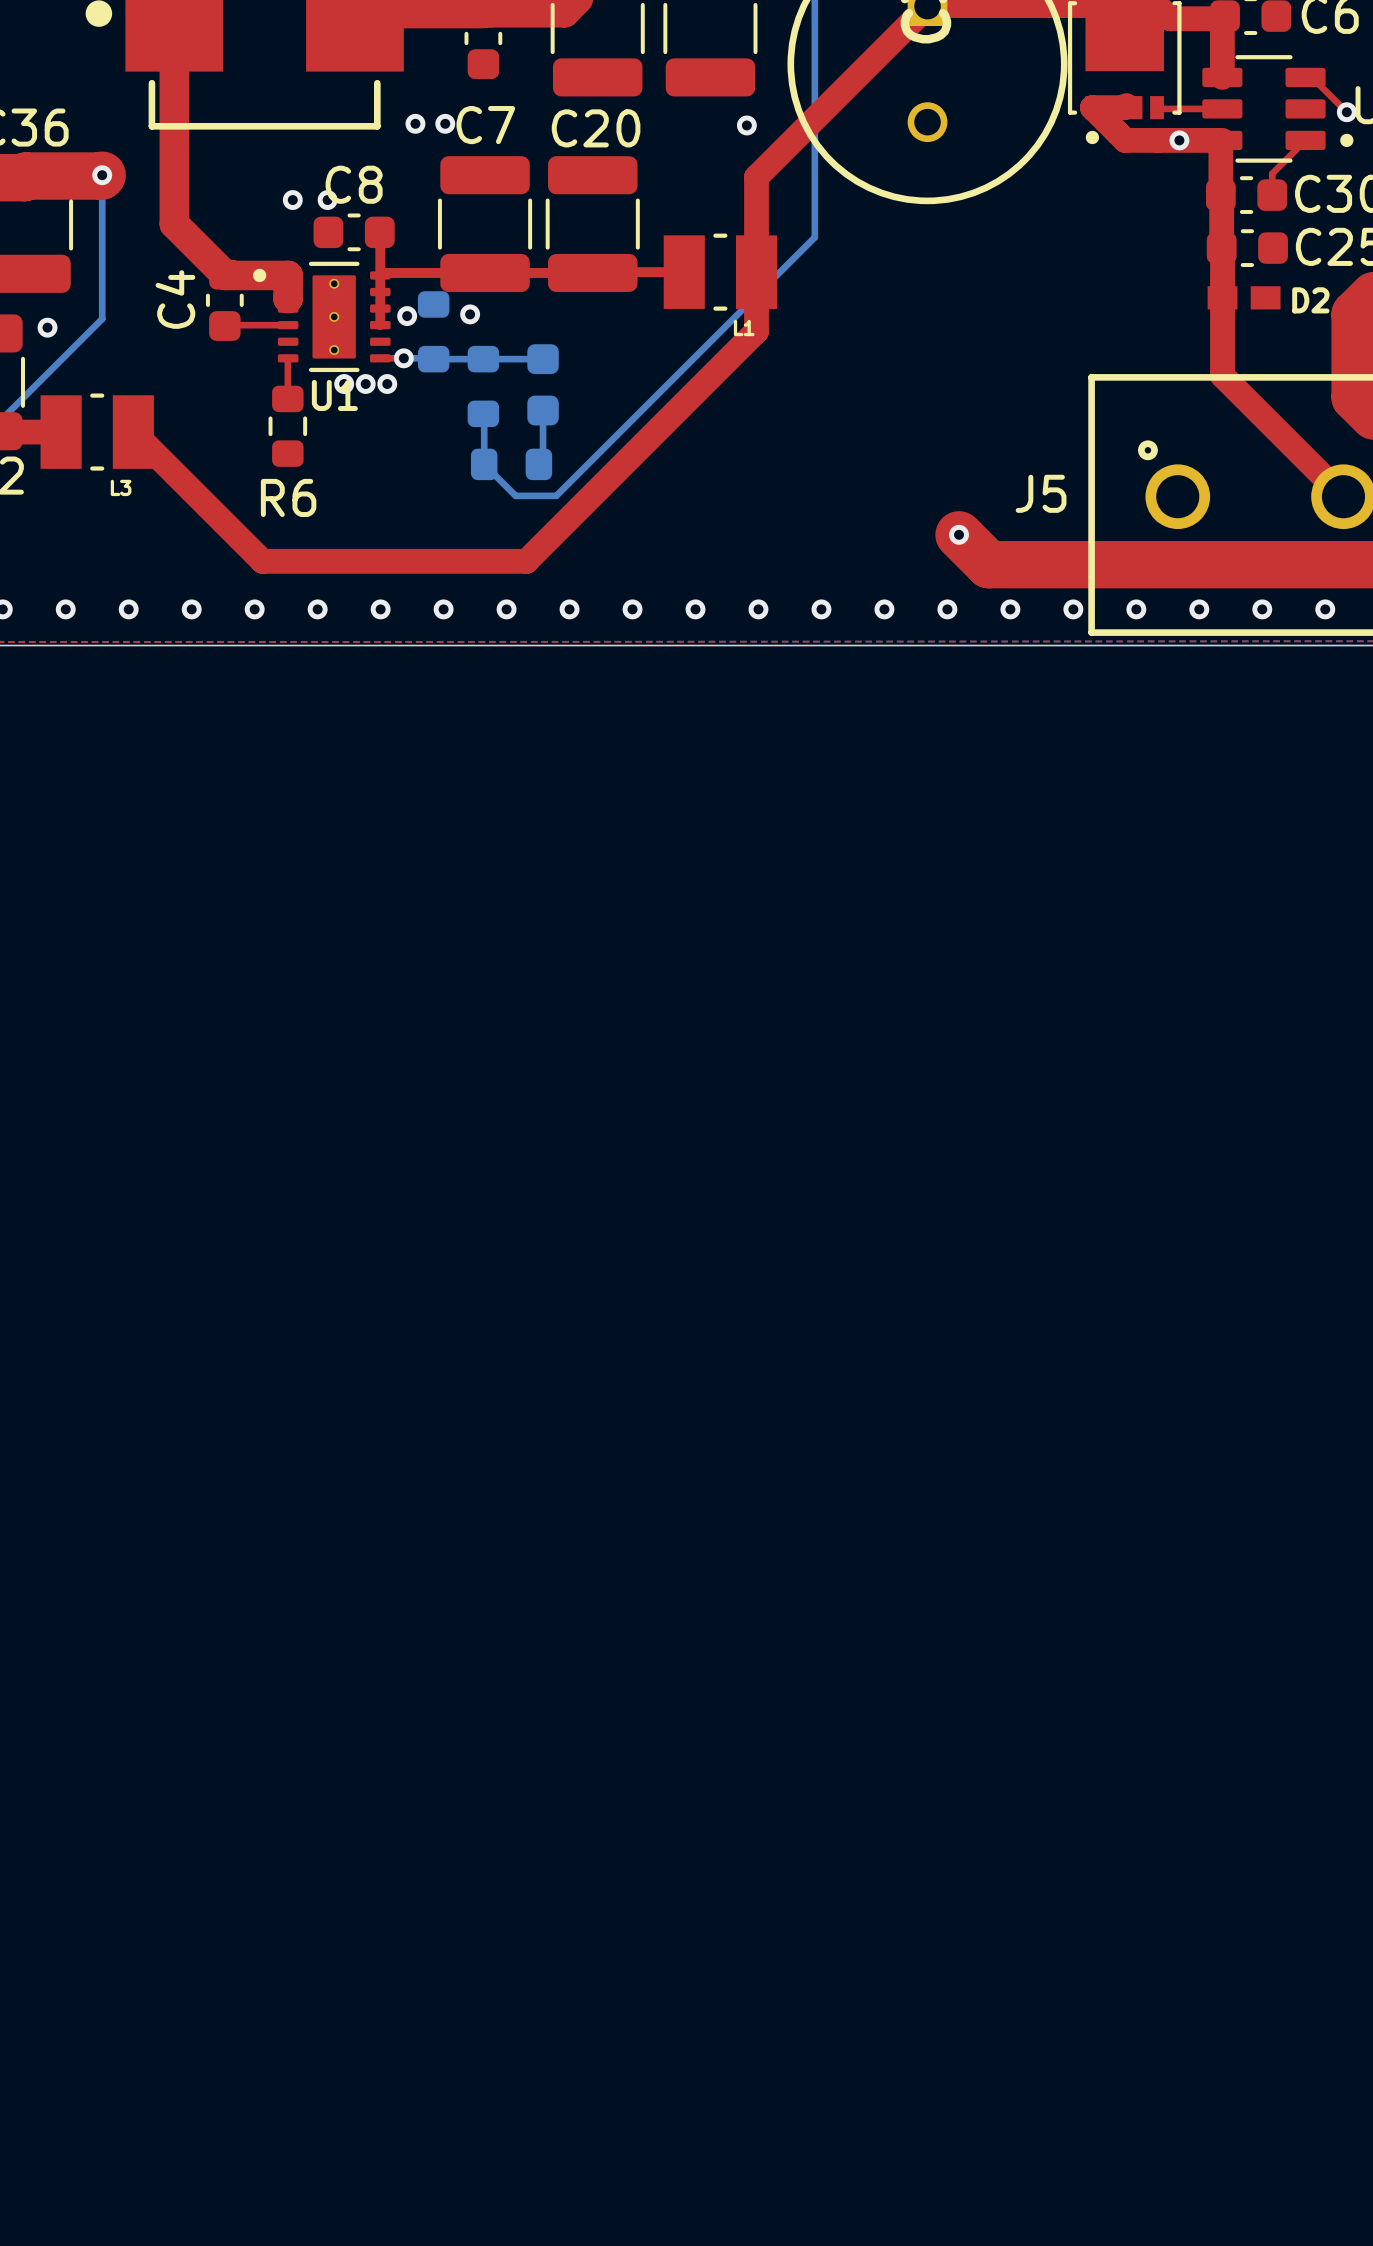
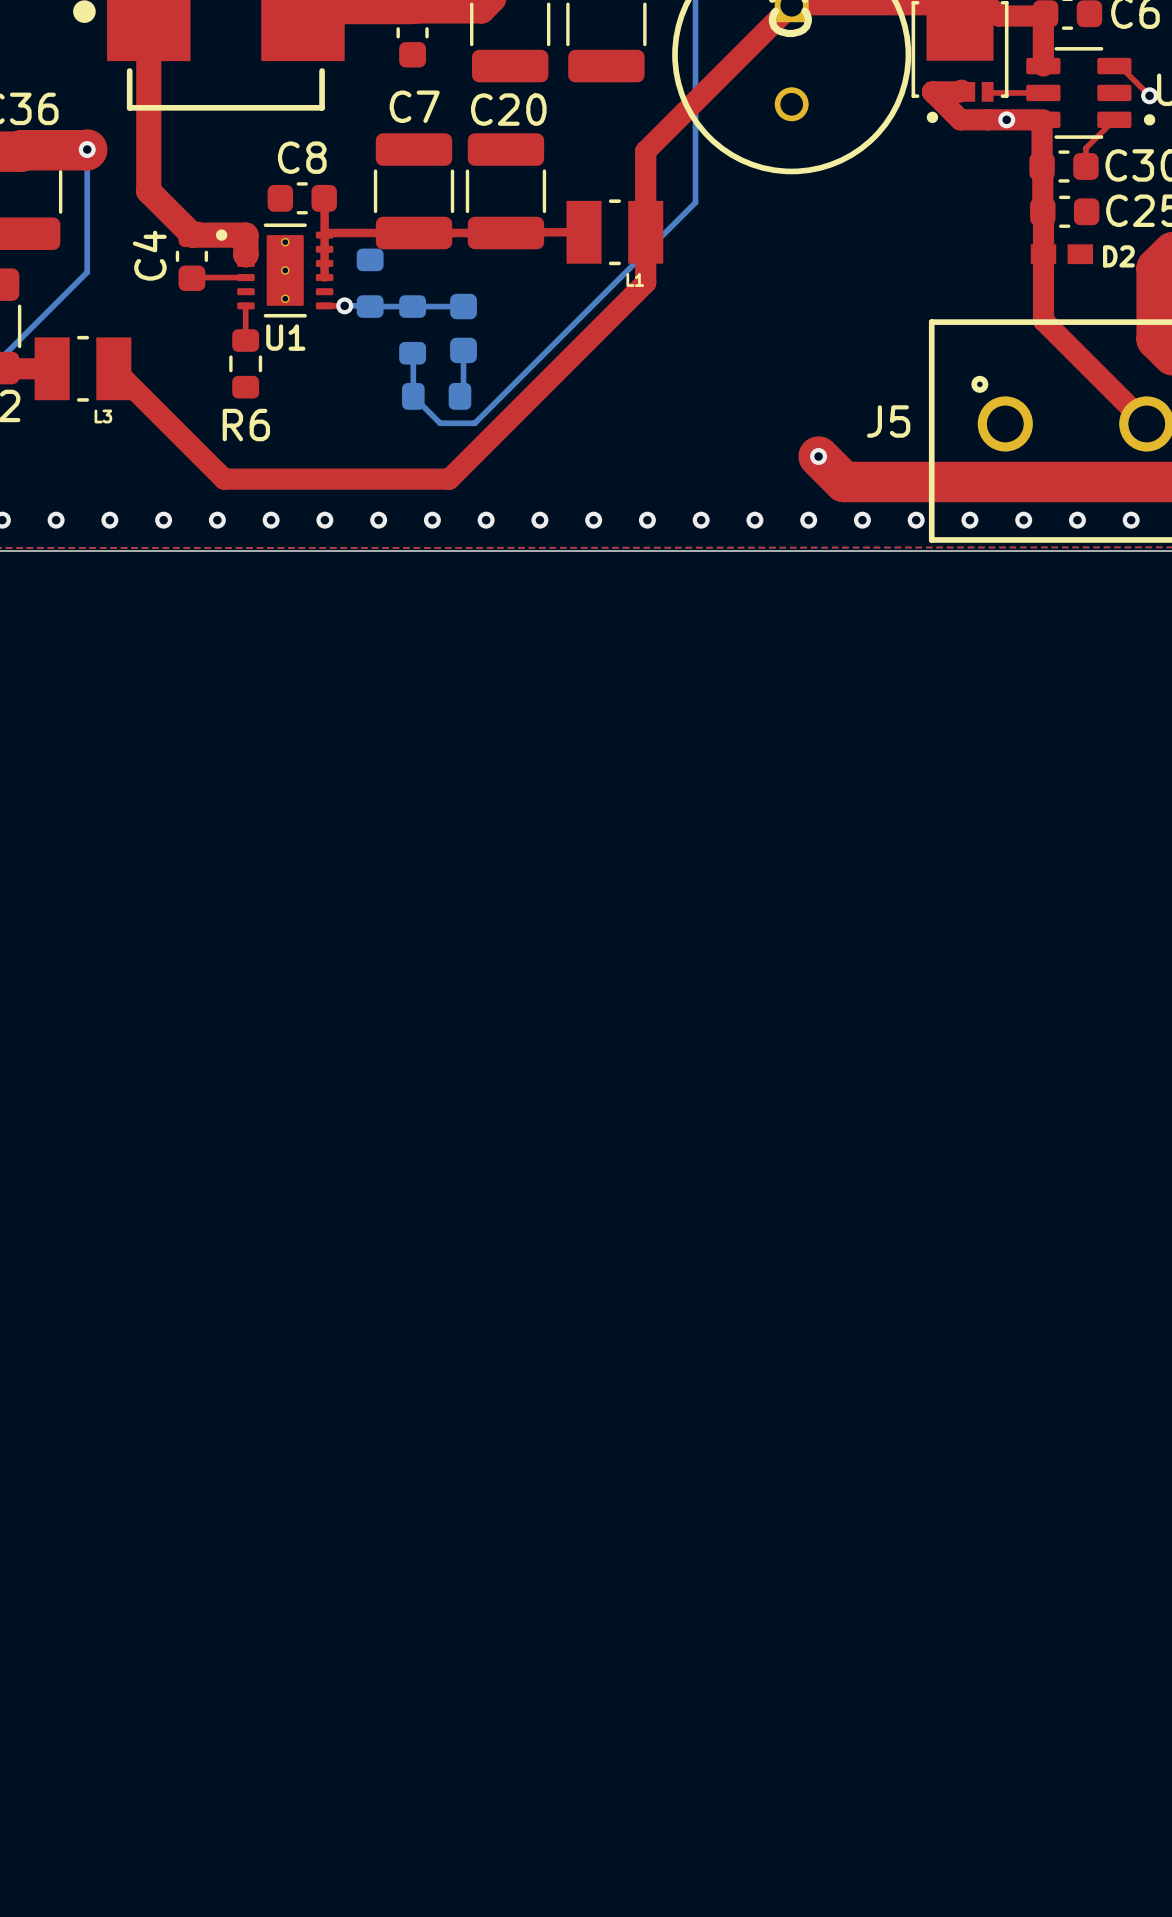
via: (415, 123) -> none
via: (445, 123) -> none
via: (746, 125) -> none
via: (292, 200) -> none
via: (327, 200) -> none
via: (470, 314) -> none
via: (407, 316) -> none
via: (47, 327) -> none
via: (344, 384) -> none
via: (365, 384) -> none
via: (387, 384) -> none

